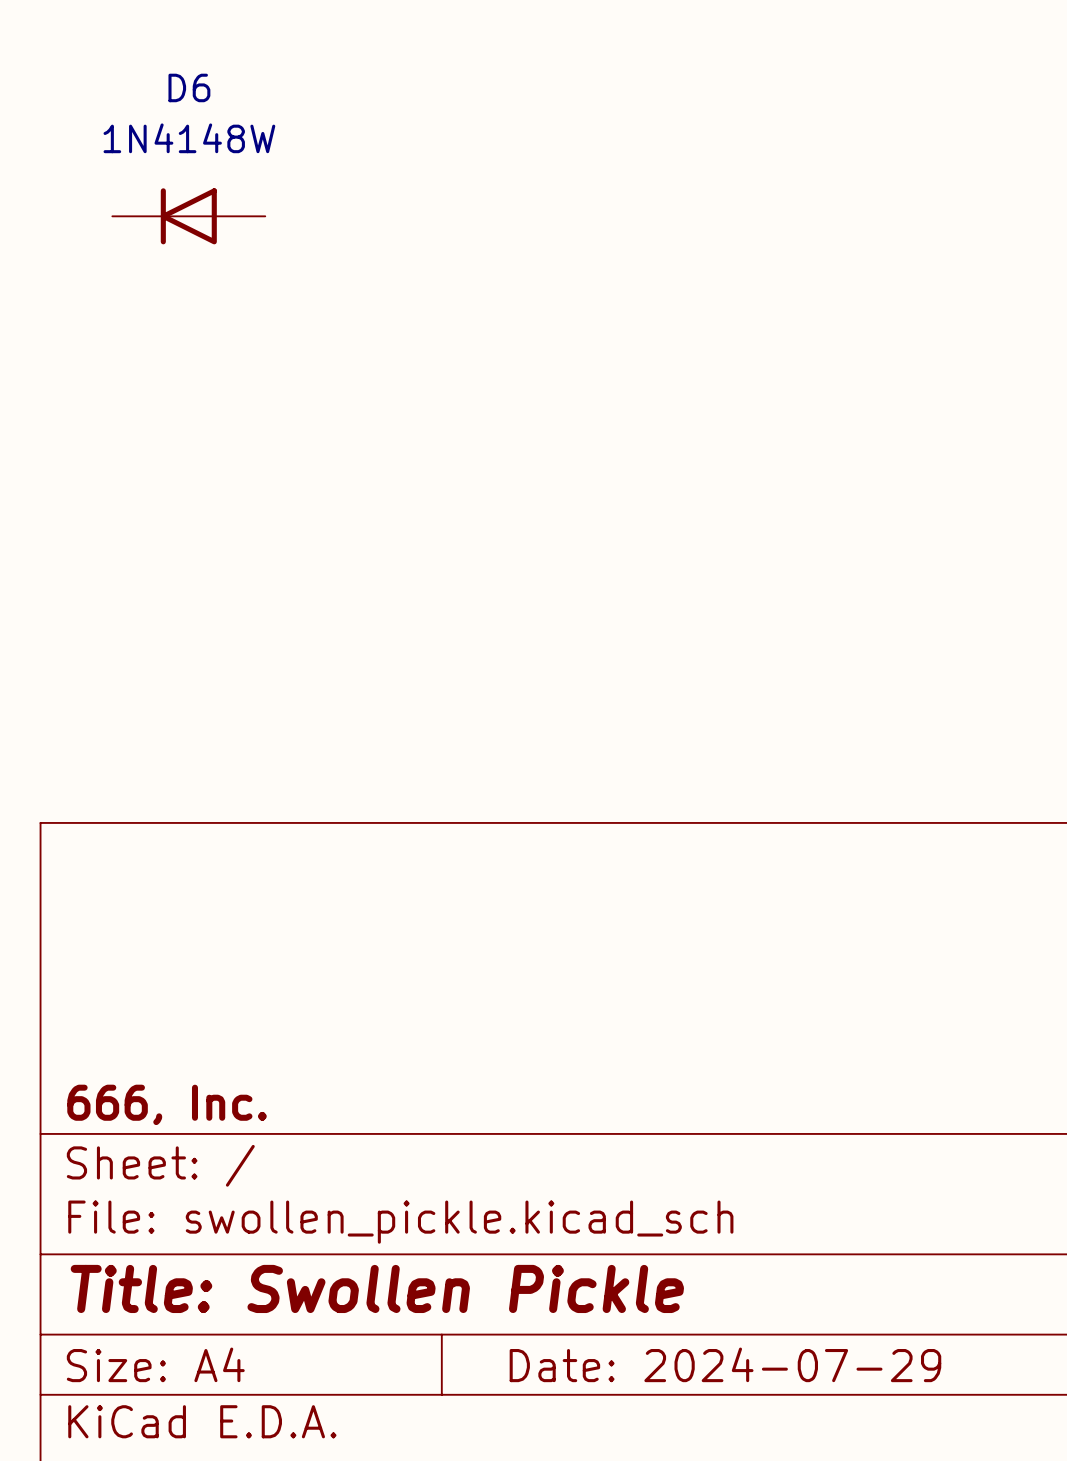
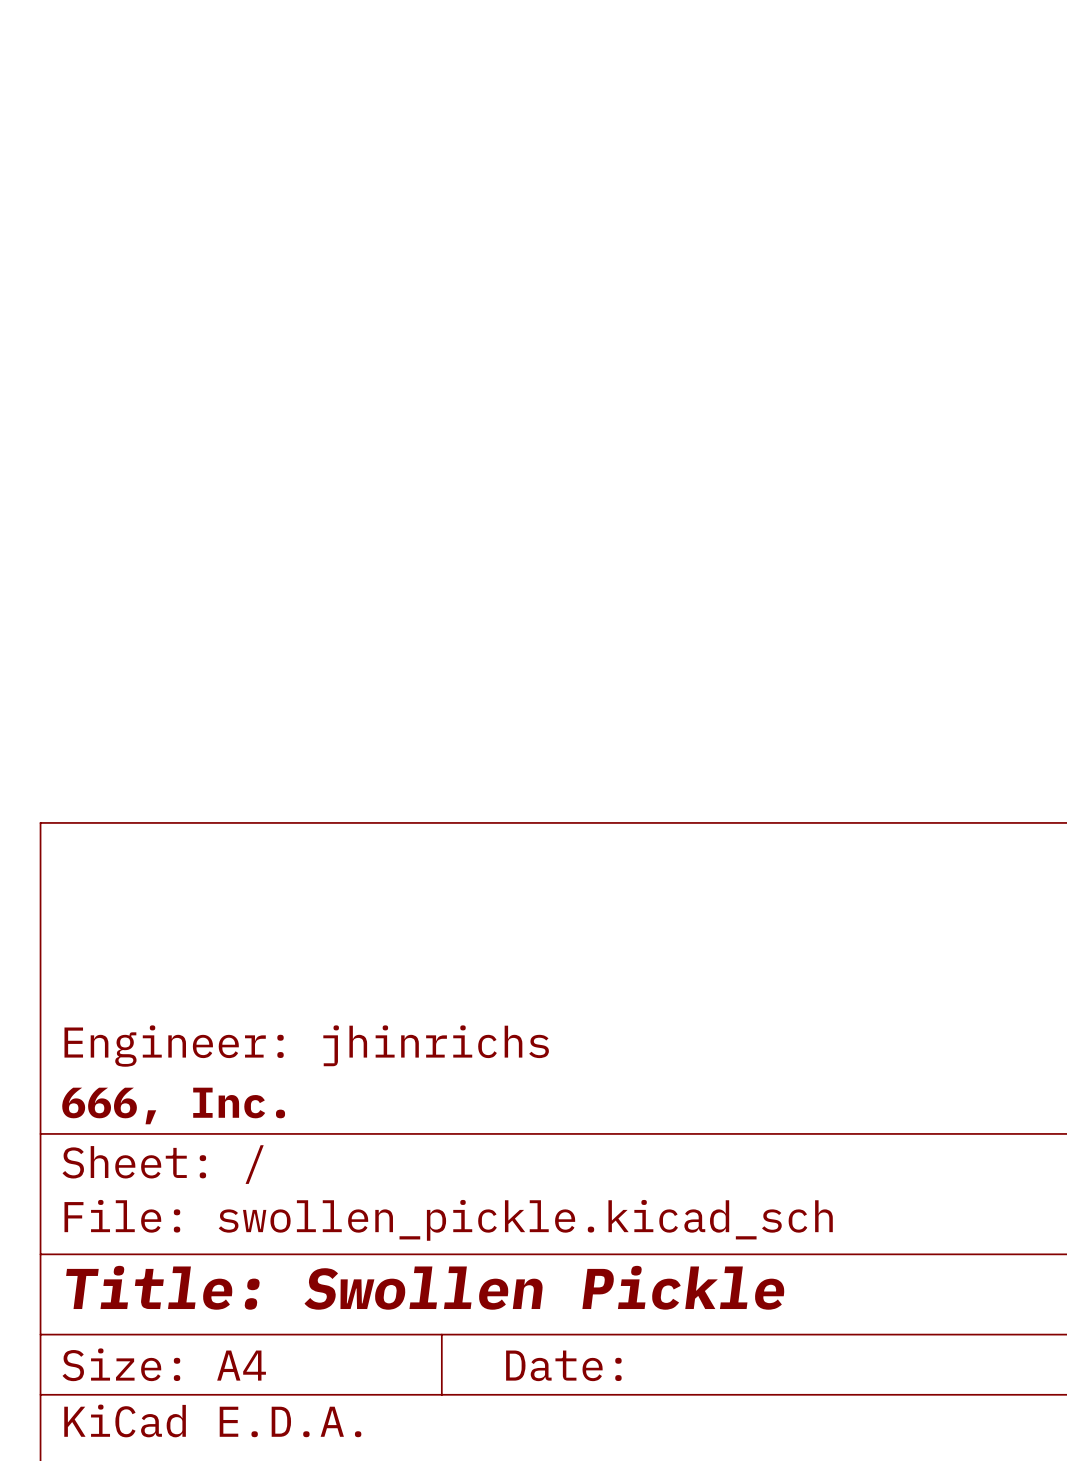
D6: 1N4148W (188, 216) -> none
title block: none -> Engineer: jhinrichs (306, 1046)
title block: Date: 2024-07-29 (725, 1364) -> Date: (563, 1365)

